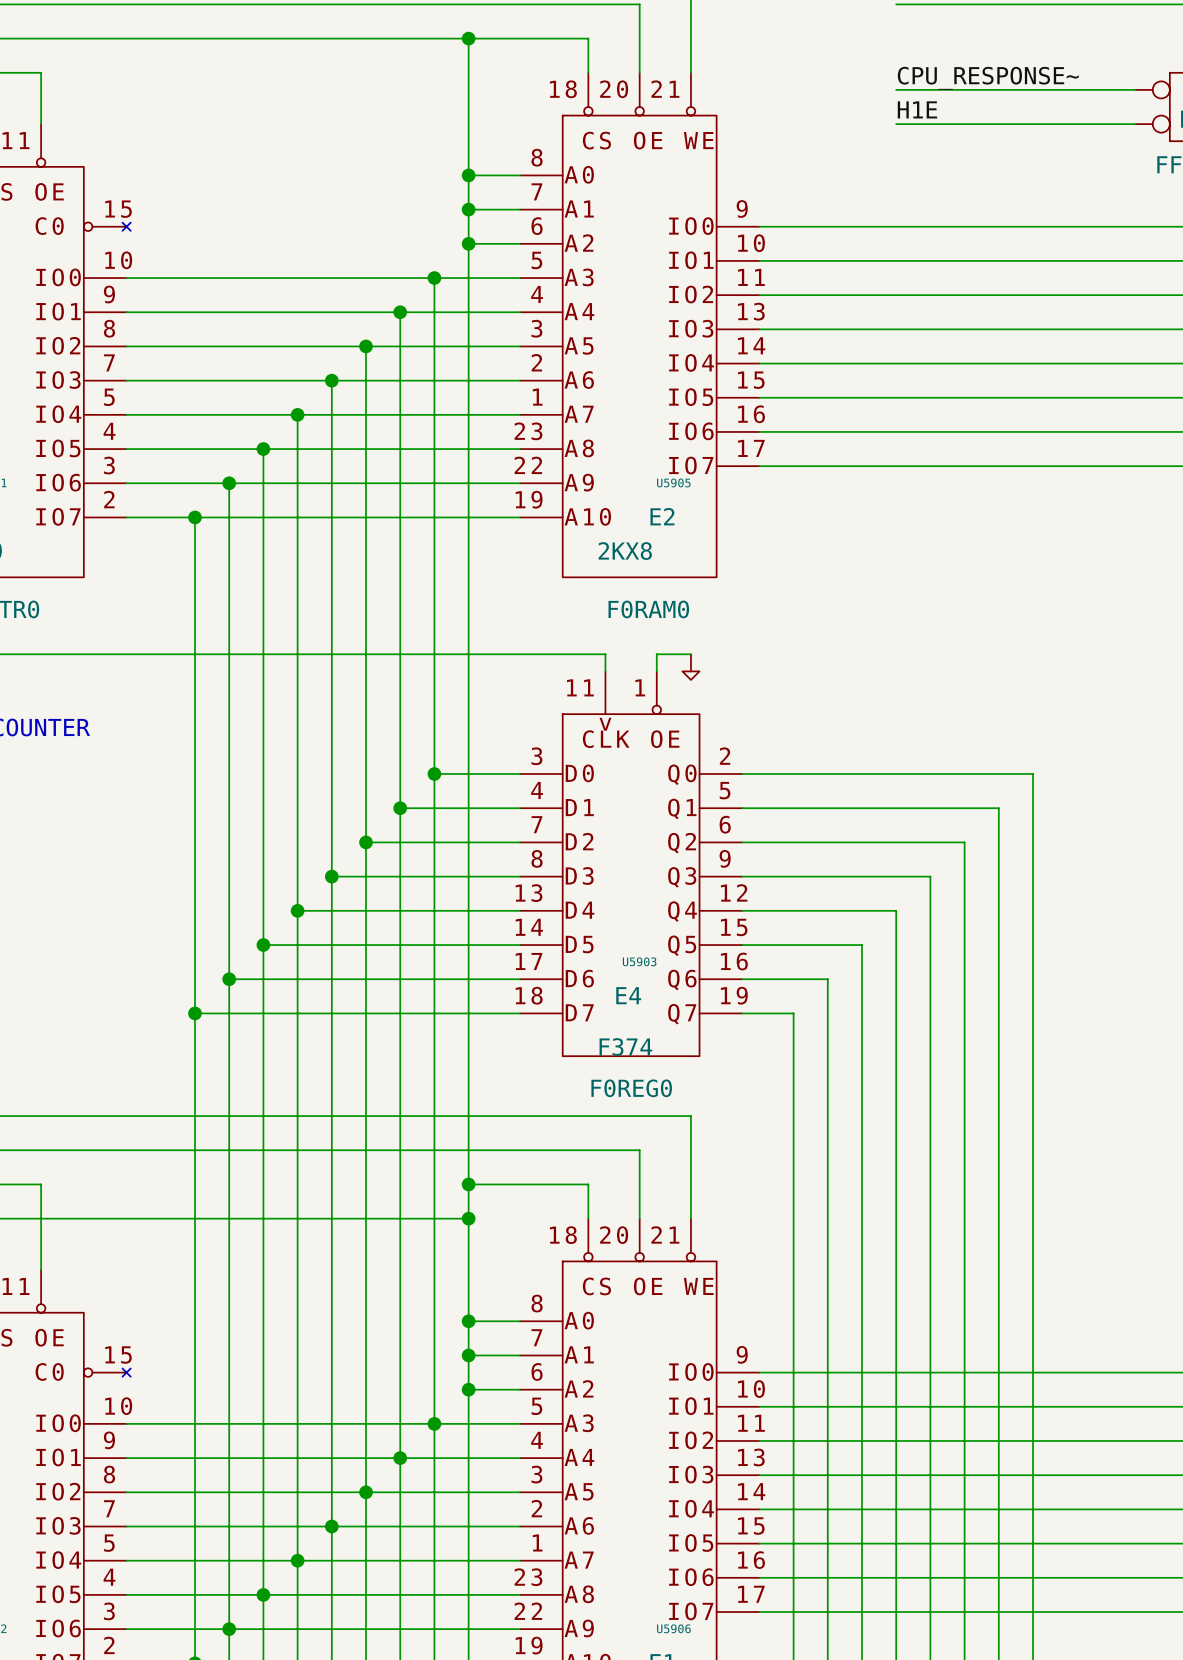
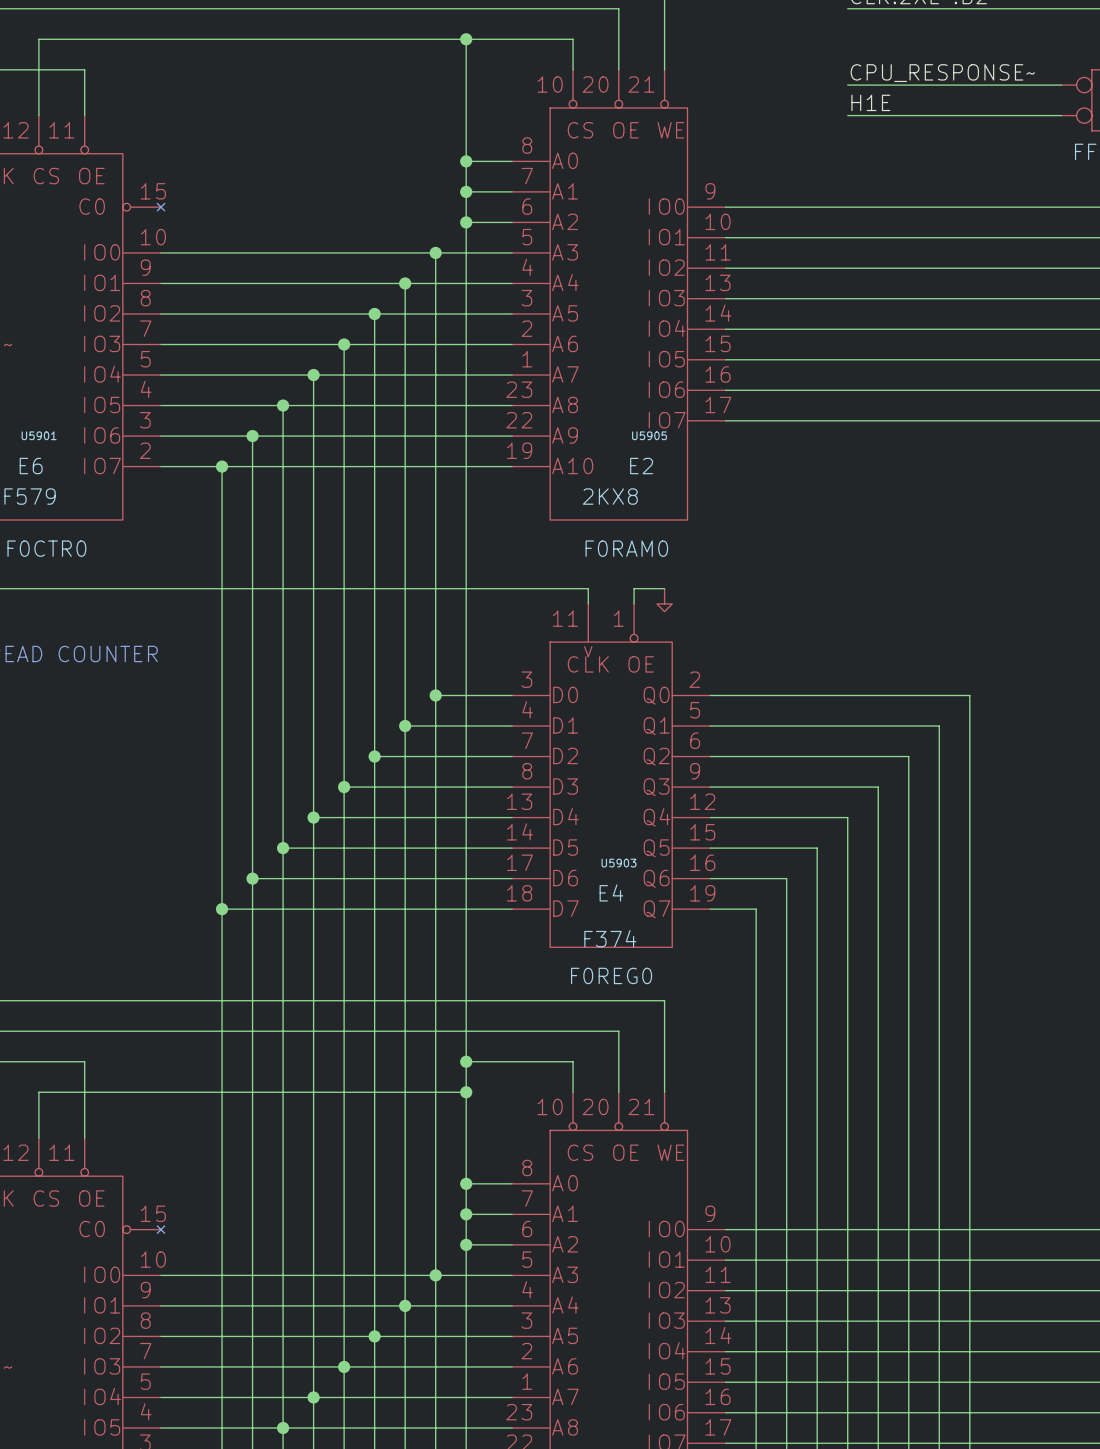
U5905 text: 8 (571, 89) -> 0 (557, 84)
U5906 text: 8 (571, 1235) -> 0 (557, 1106)

